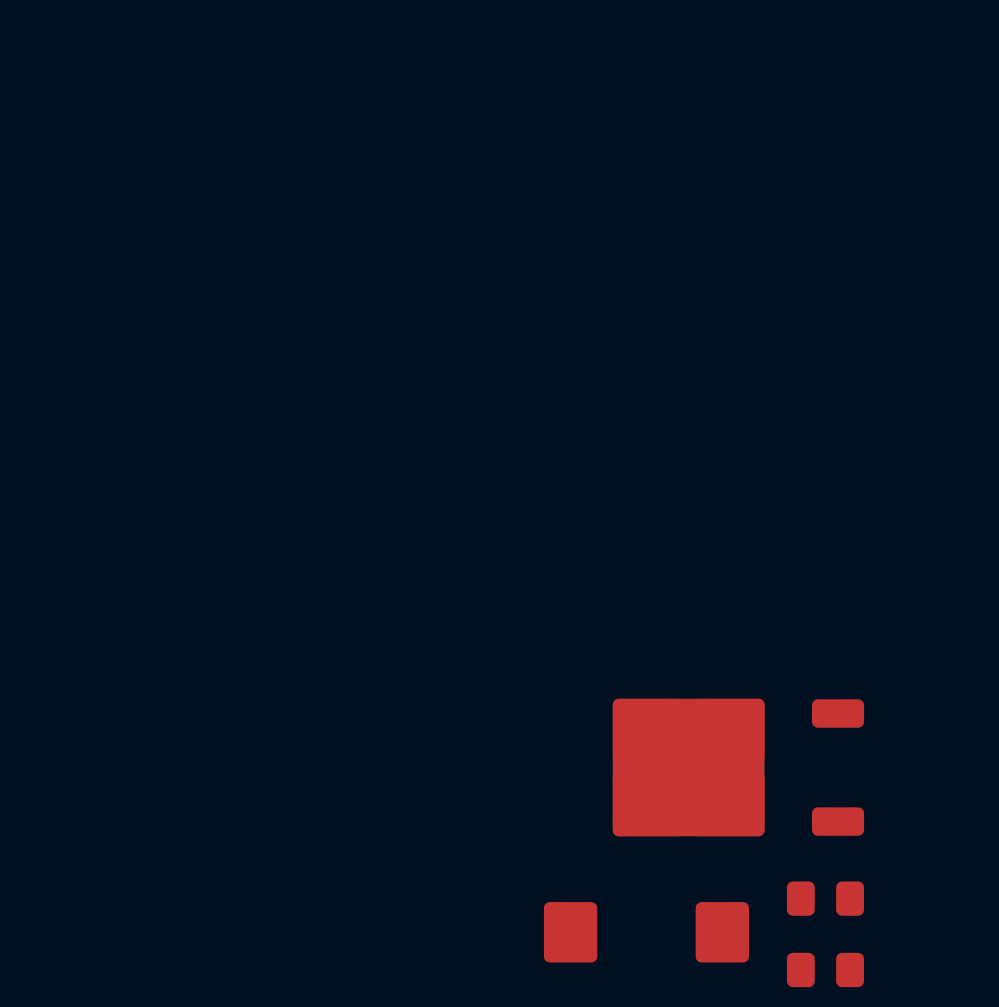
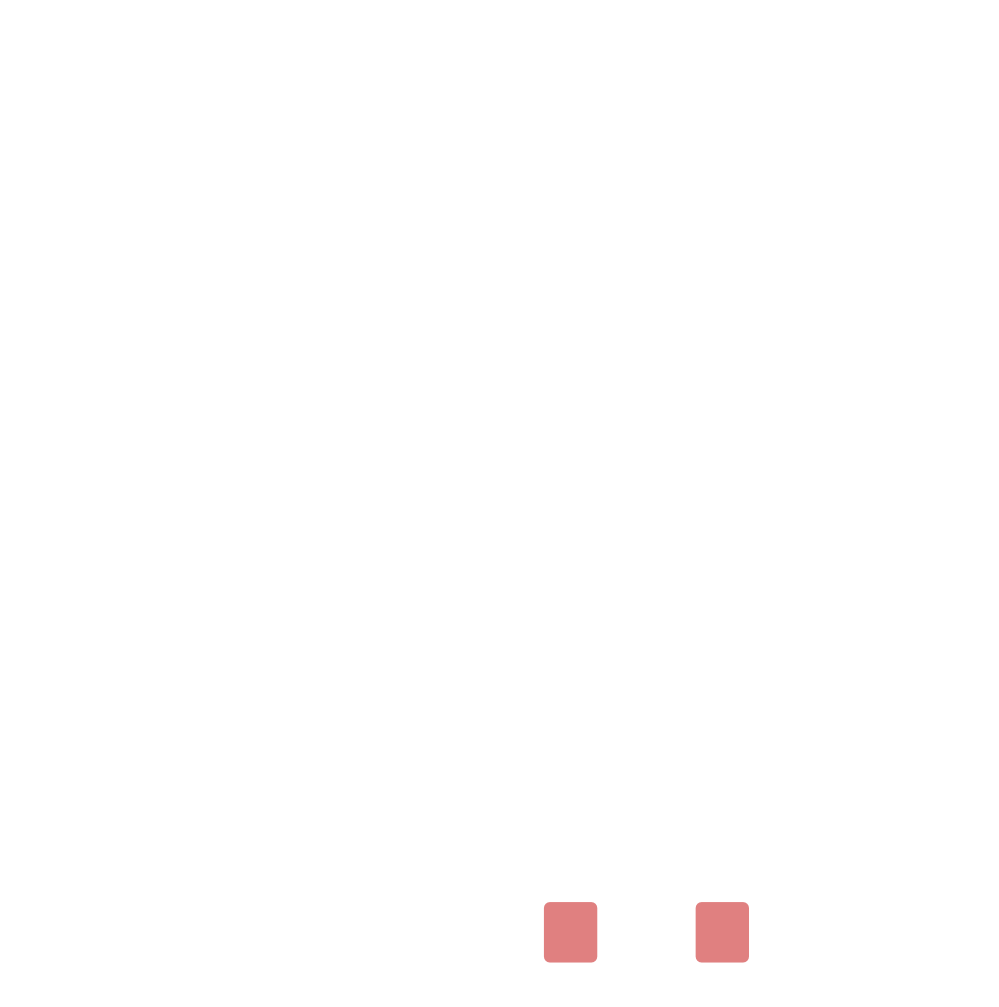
part: (738, 767) -> none
part: (825, 898) -> none
part: (825, 969) -> none

